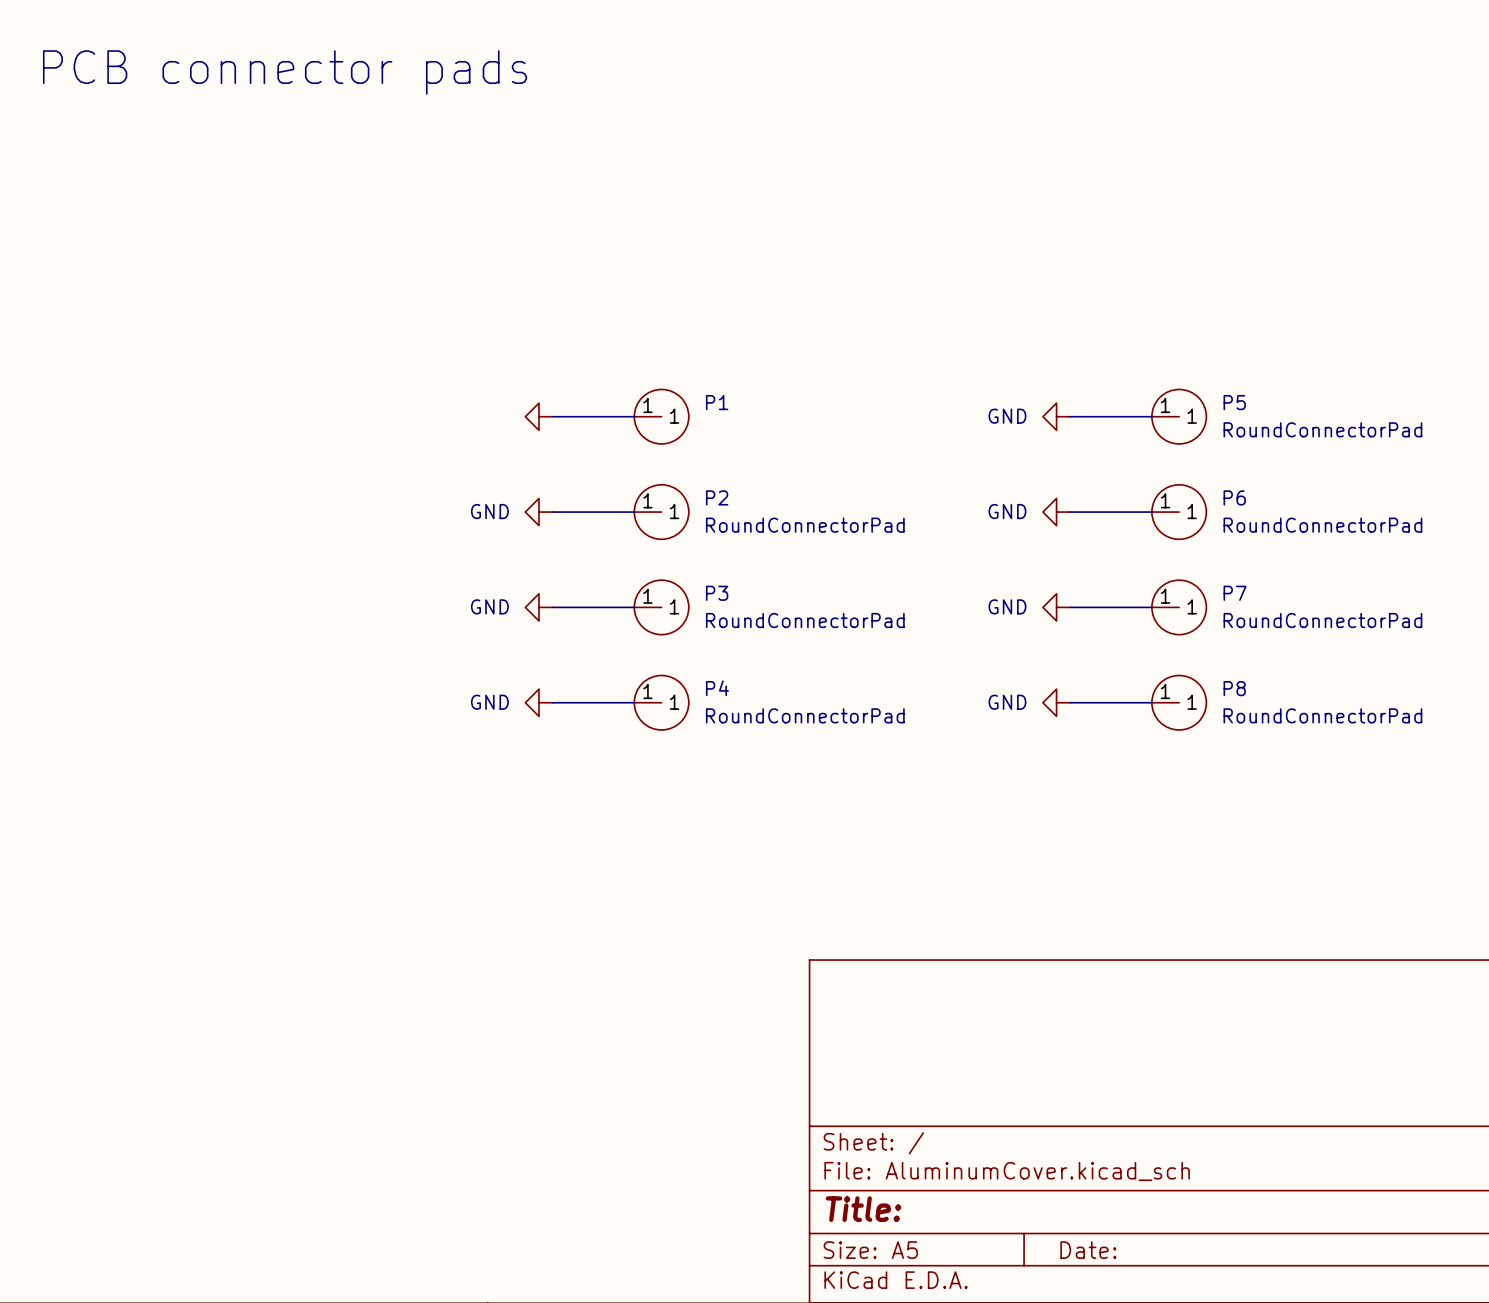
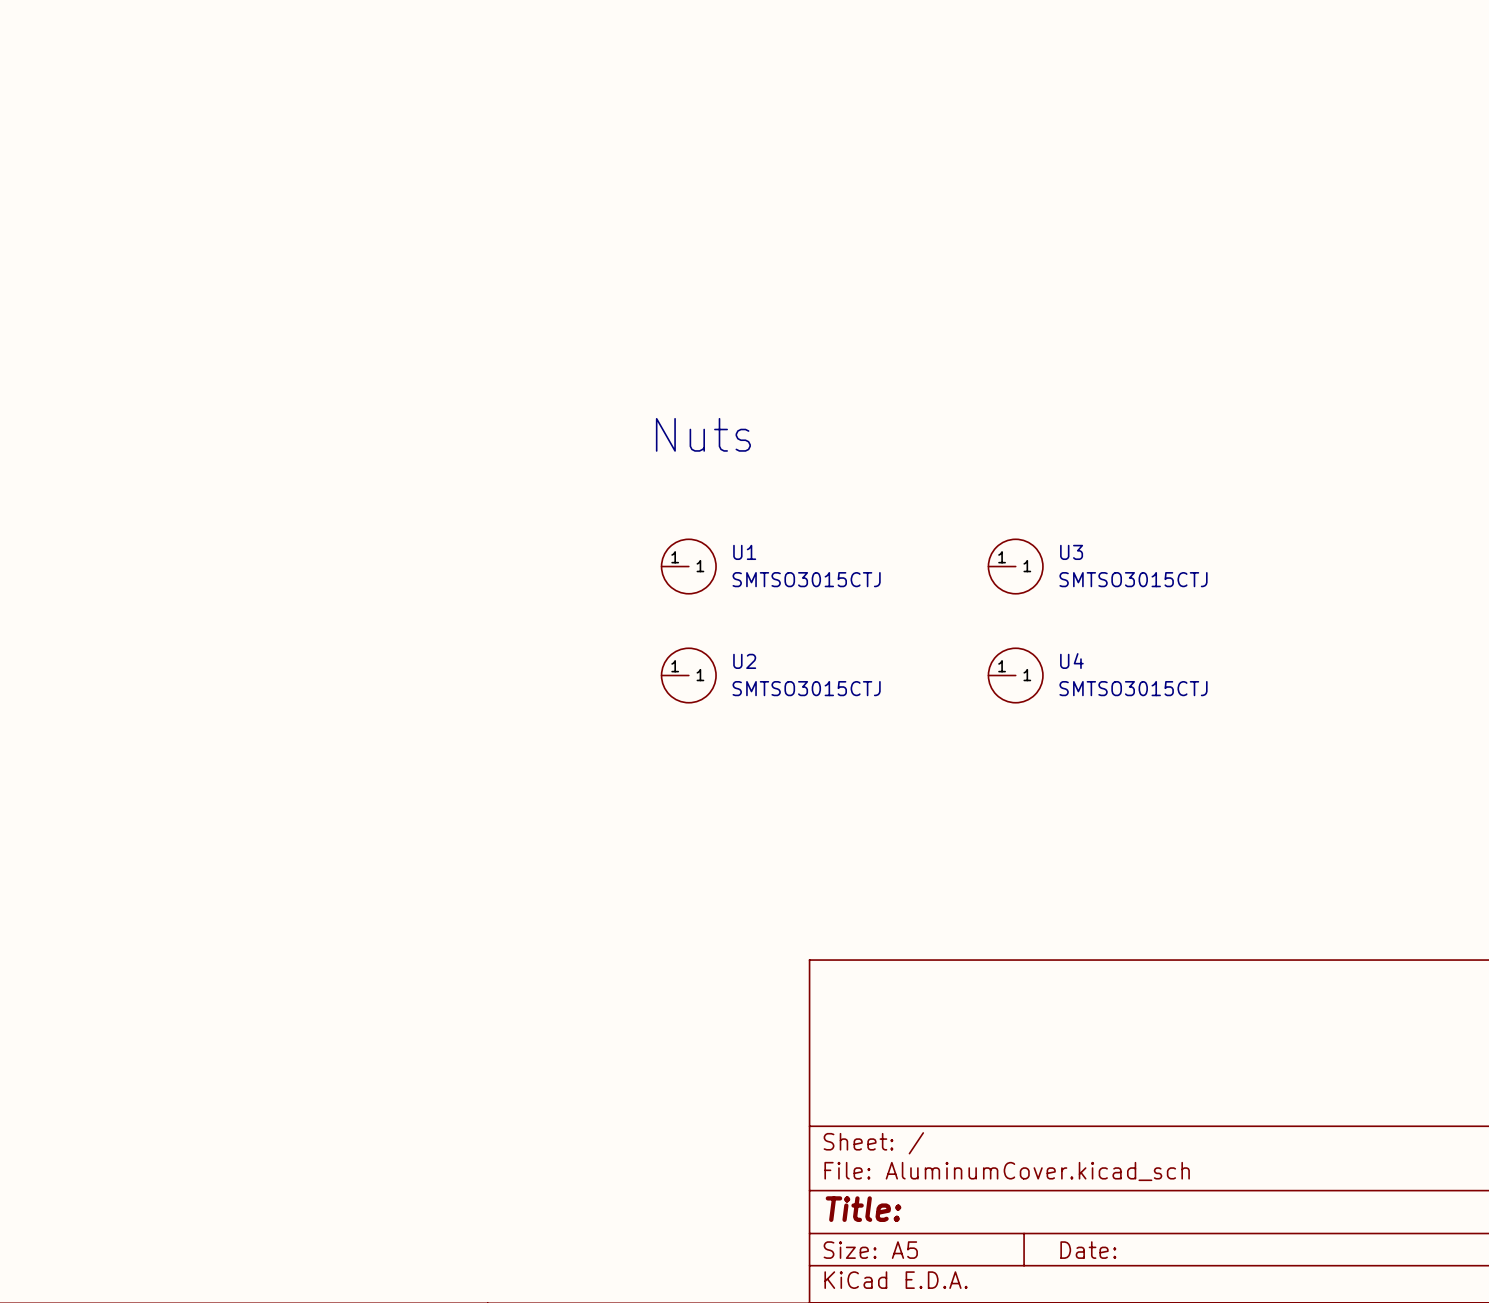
text: PCB connector pads (285, 72) -> none
power symbol: (538, 416) -> none
wire: (552, 416) (634, 416) -> none
P1: (661, 416) -> none
power symbol: GND (1056, 416) -> none
wire: (1070, 416) (1151, 416) -> none
P5: RoundConnectorPad (1179, 416) -> none
text: none -> Nuts (703, 434)
power symbol: GND (538, 512) -> none
wire: (552, 512) (634, 512) -> none
P2: RoundConnectorPad (661, 512) -> none
power symbol: GND (1056, 512) -> none
wire: (1070, 512) (1151, 512) -> none
P6: RoundConnectorPad (1179, 512) -> none
U1: none -> SMTSO3015CTJ (688, 566)
U3: none -> SMTSO3015CTJ (1015, 566)
power symbol: GND (538, 607) -> none
wire: (552, 607) (634, 607) -> none
P3: RoundConnectorPad (661, 607) -> none
power symbol: GND (1056, 607) -> none
wire: (1070, 607) (1151, 607) -> none
P7: RoundConnectorPad (1179, 607) -> none
U2: none -> SMTSO3015CTJ (688, 675)
U4: none -> SMTSO3015CTJ (1015, 675)
power symbol: GND (538, 702) -> none
wire: (552, 702) (634, 702) -> none
P4: RoundConnectorPad (661, 702) -> none
power symbol: GND (1056, 702) -> none
wire: (1070, 702) (1151, 702) -> none
P8: RoundConnectorPad (1179, 702) -> none

